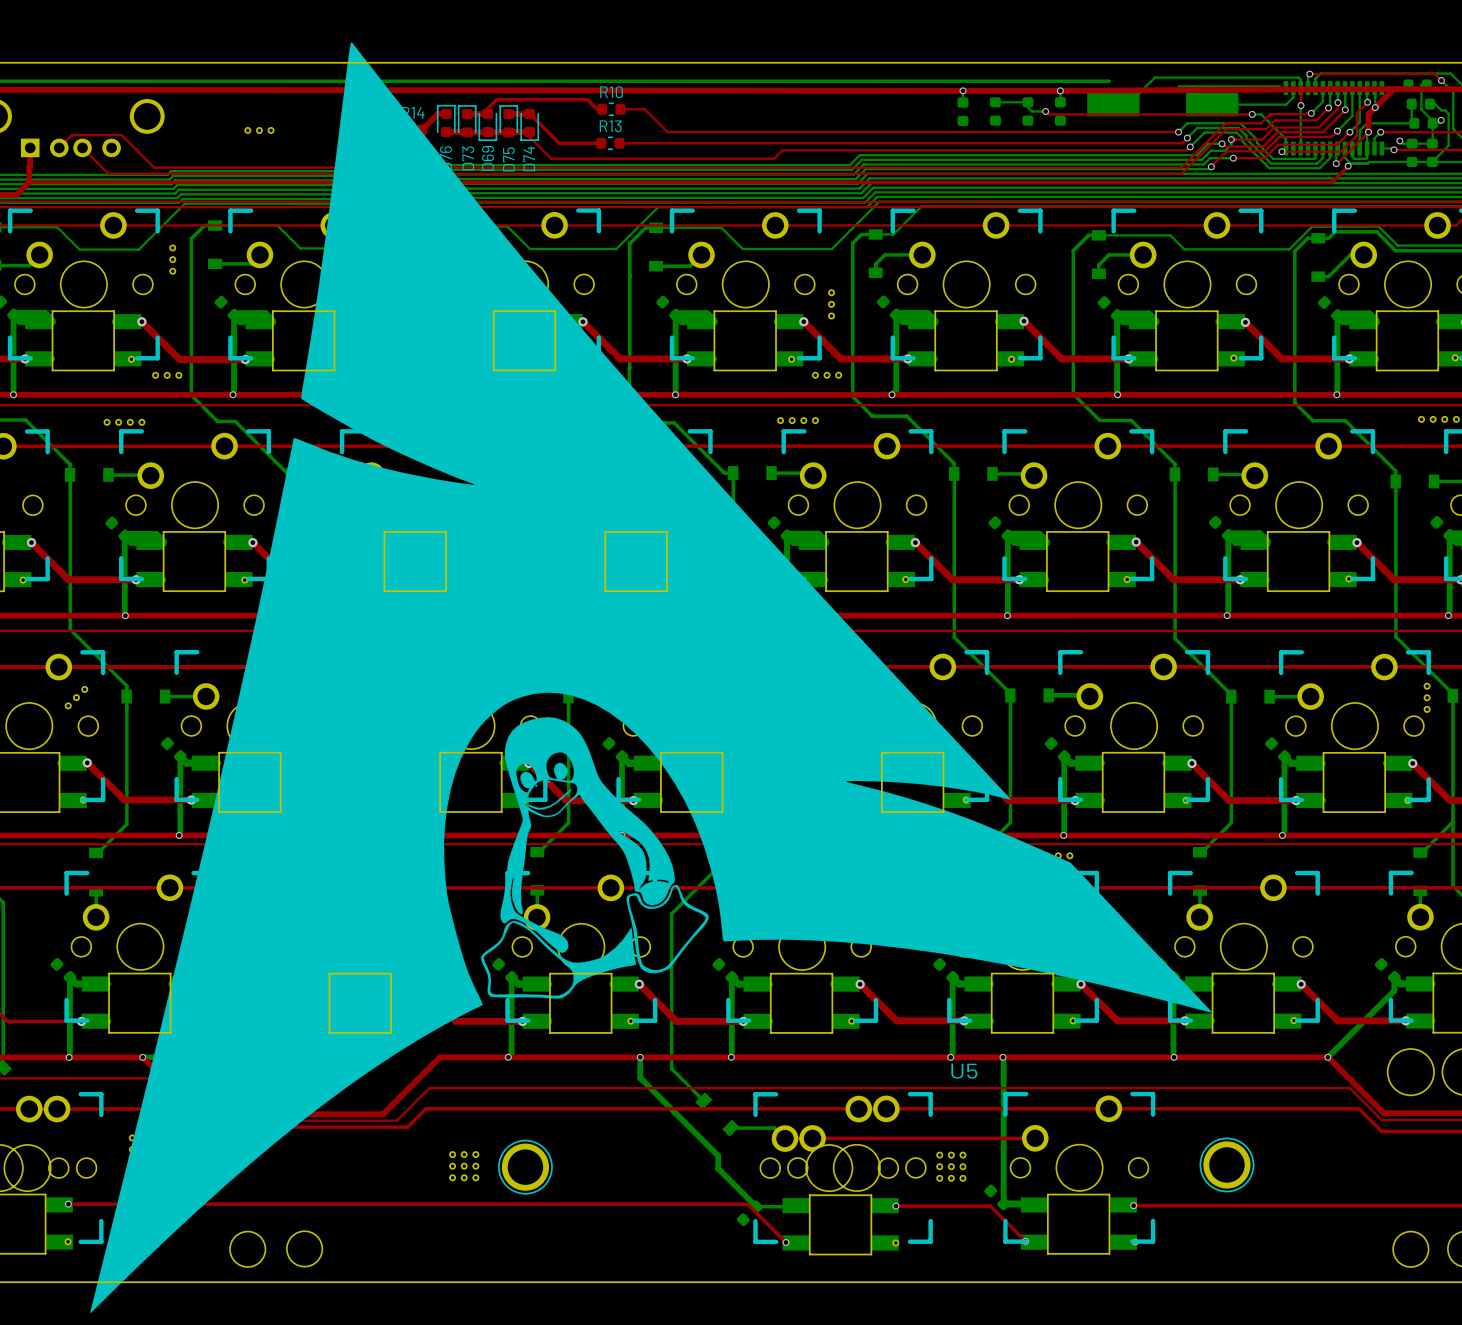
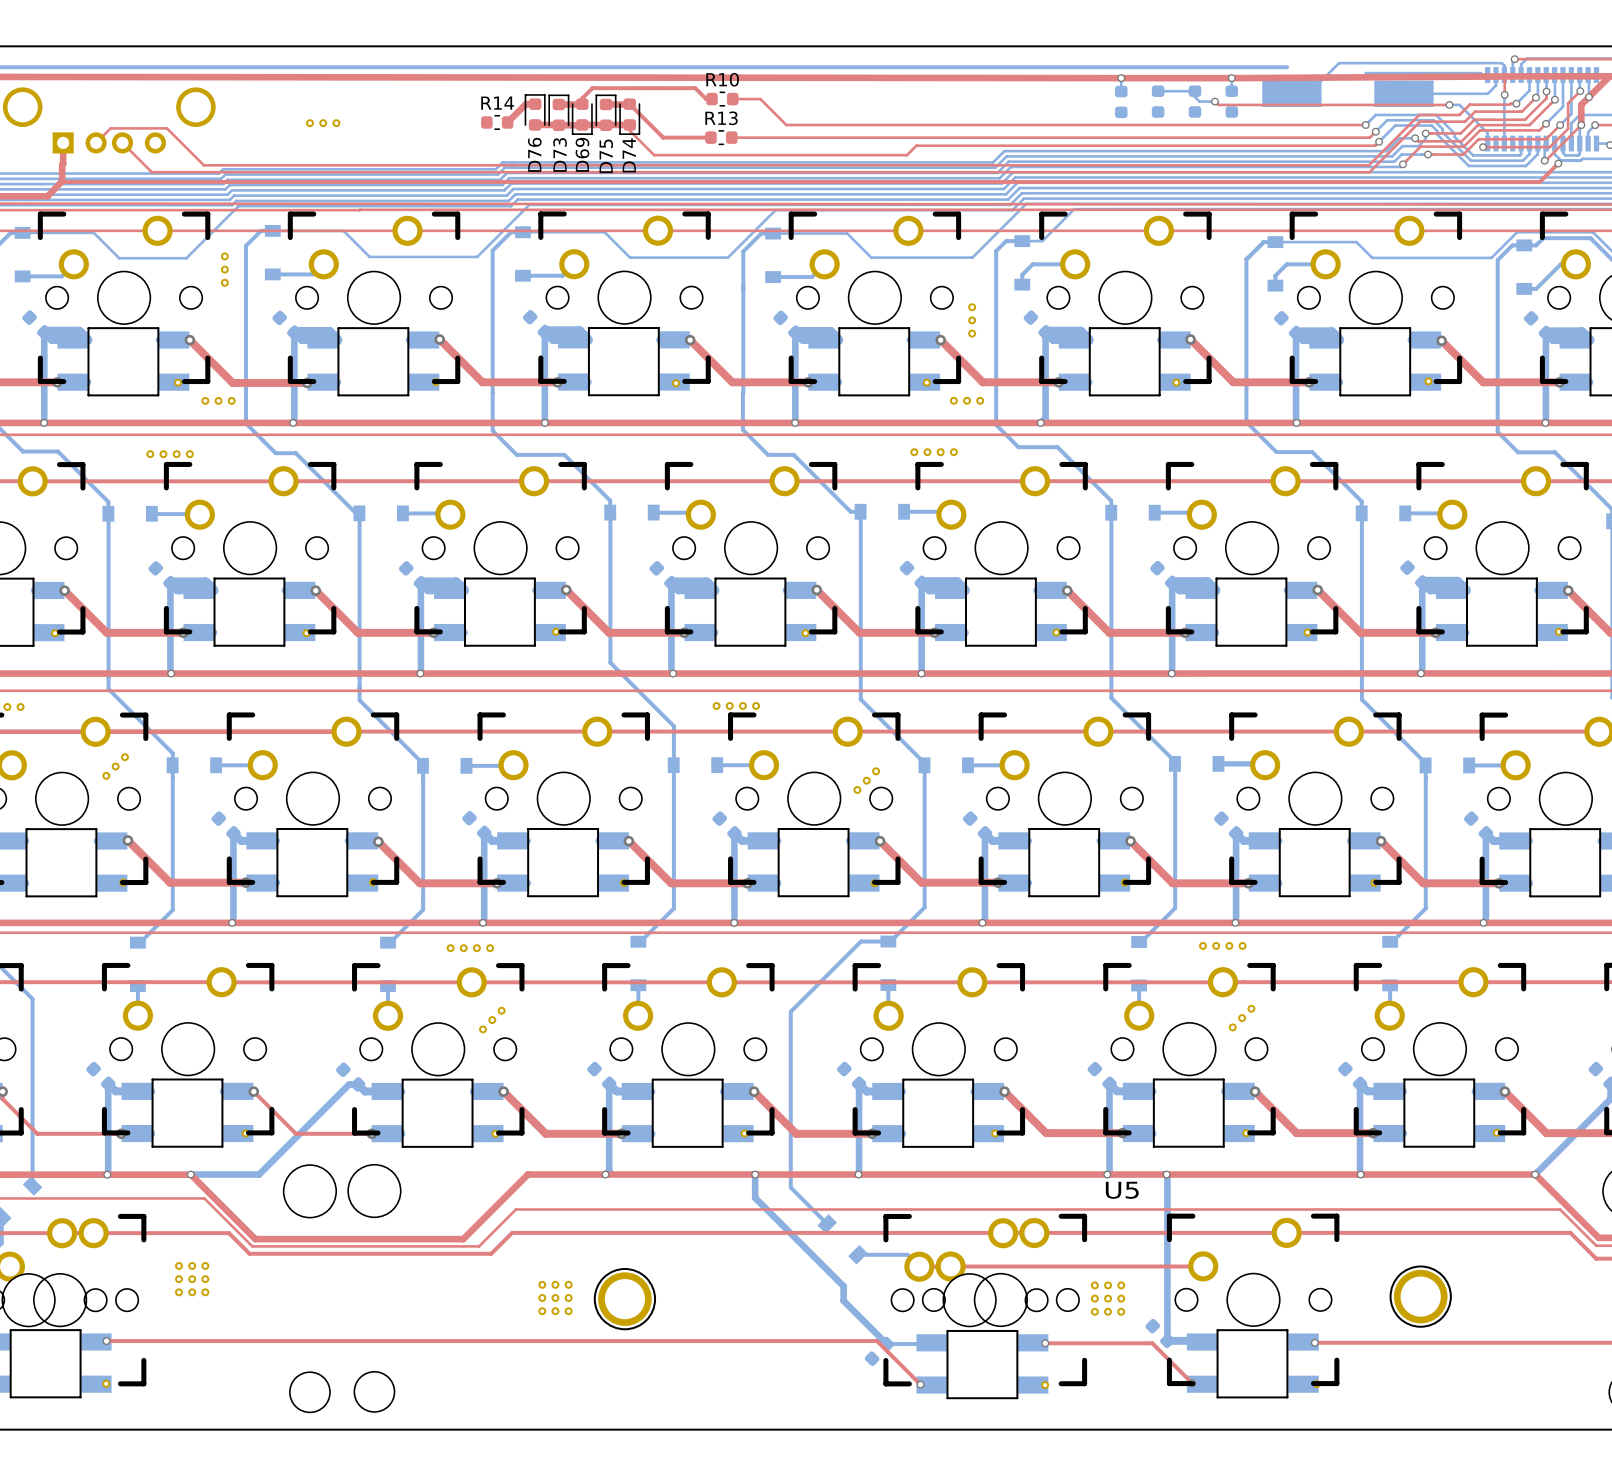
drawing: [90, 42, 1212, 1314] -> none

